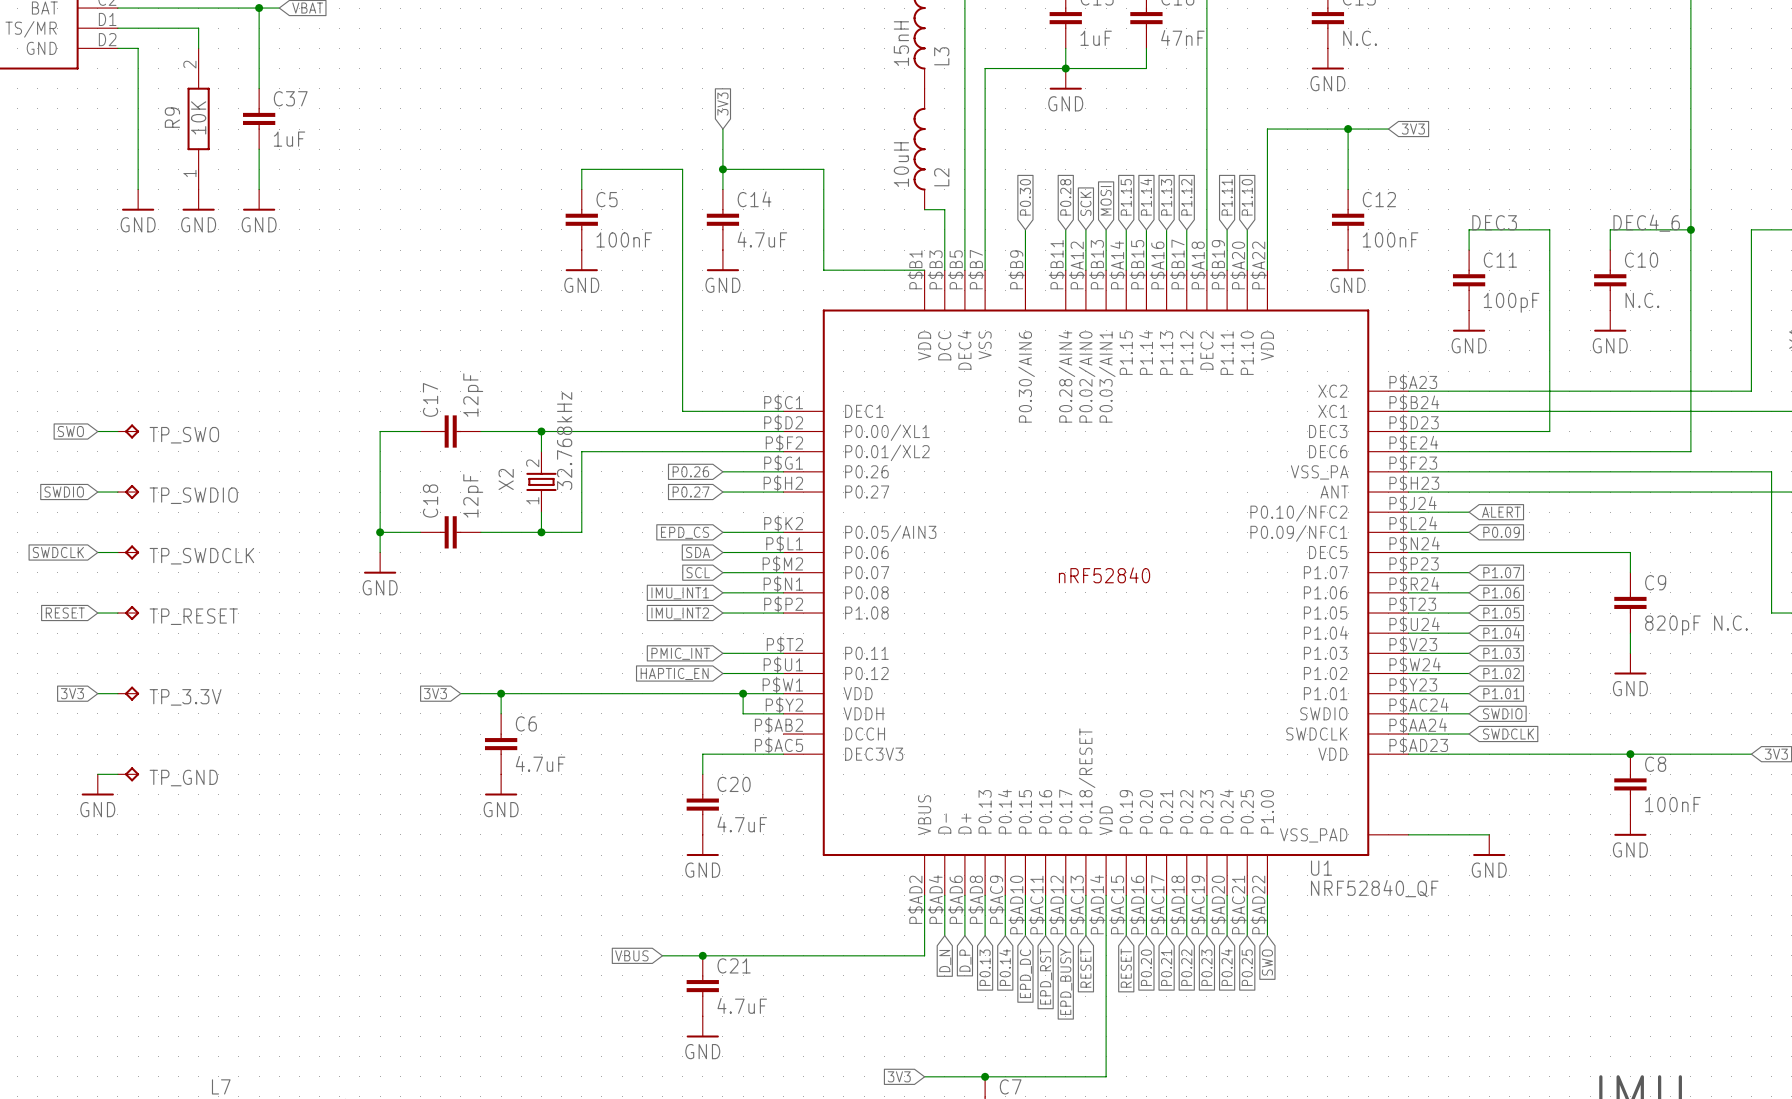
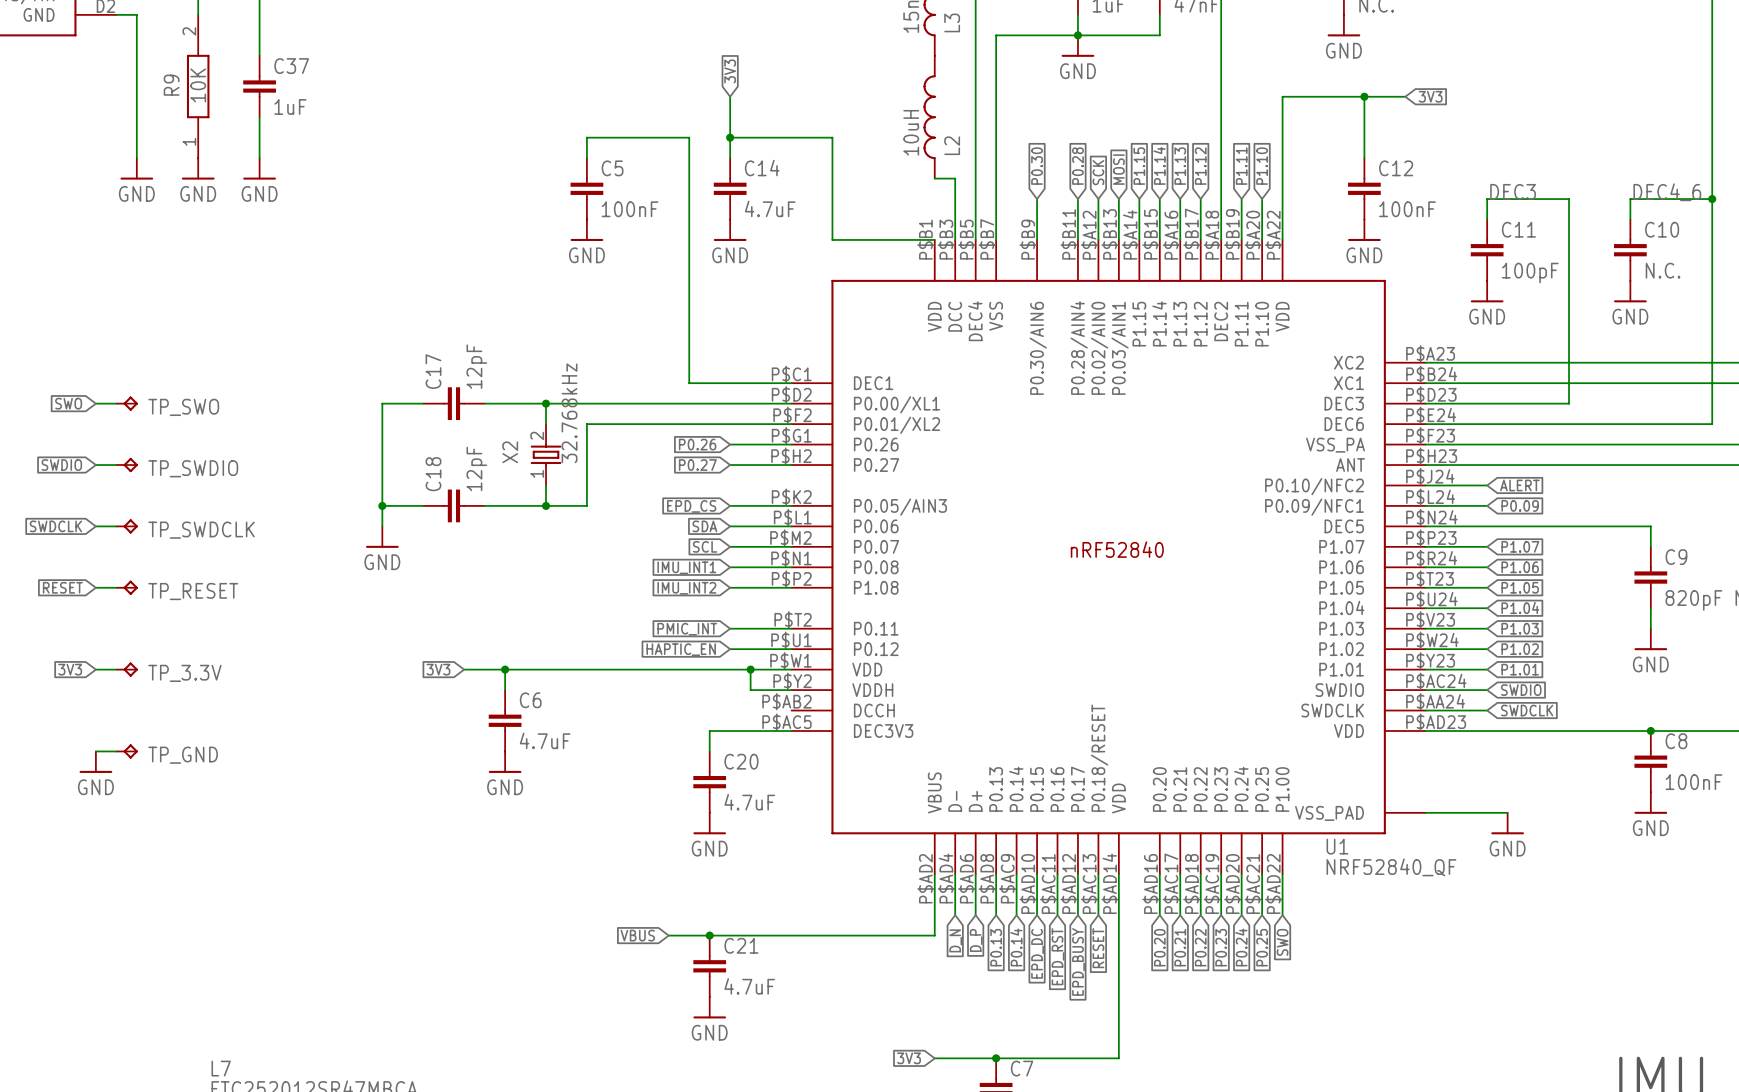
U1 symbol: [783, 270, 1409, 896] -> [791, 239, 1426, 875]
wire: (1126, 895) (1126, 935) -> none
global label: RESET (1126, 968) -> none

